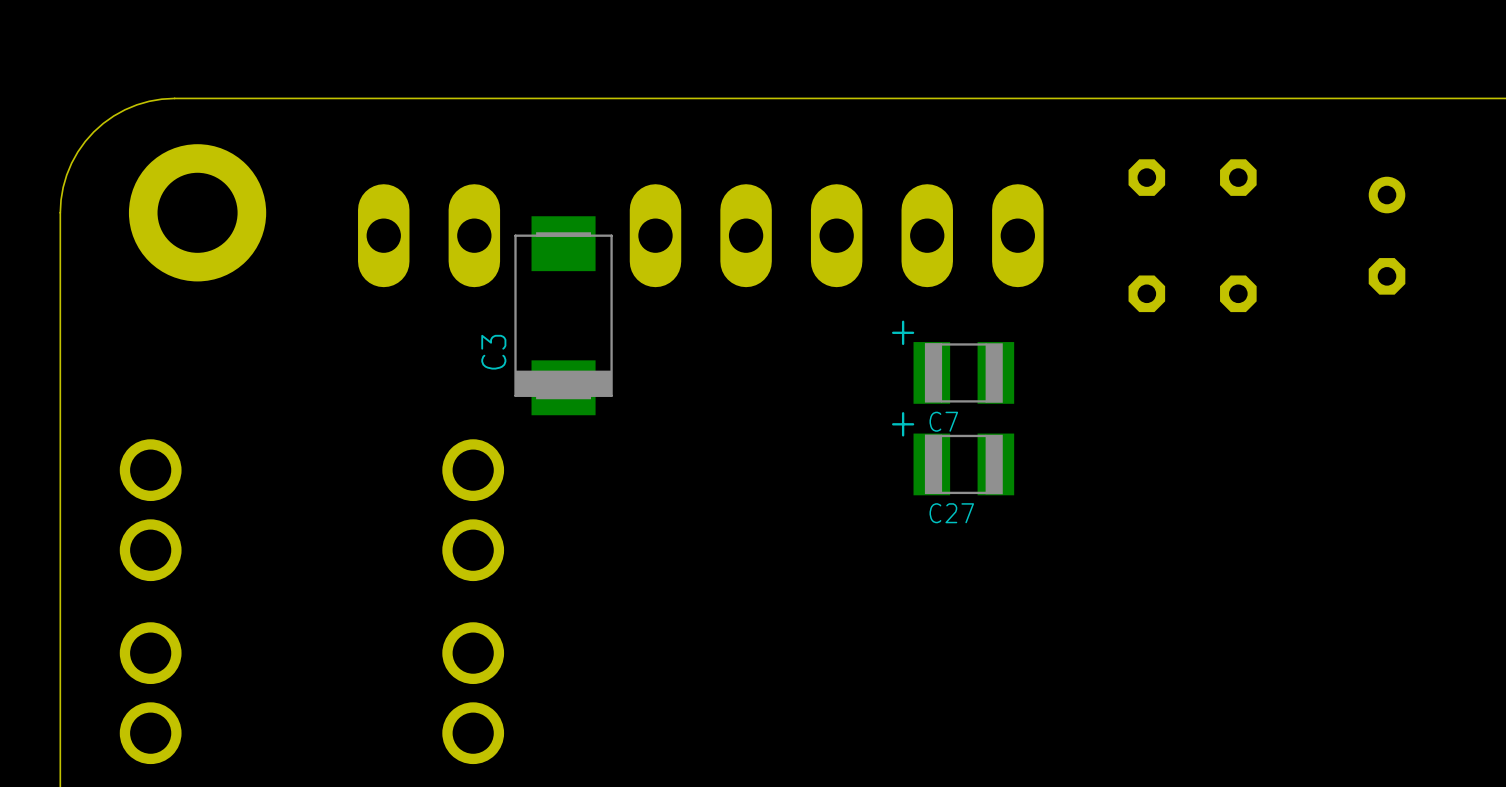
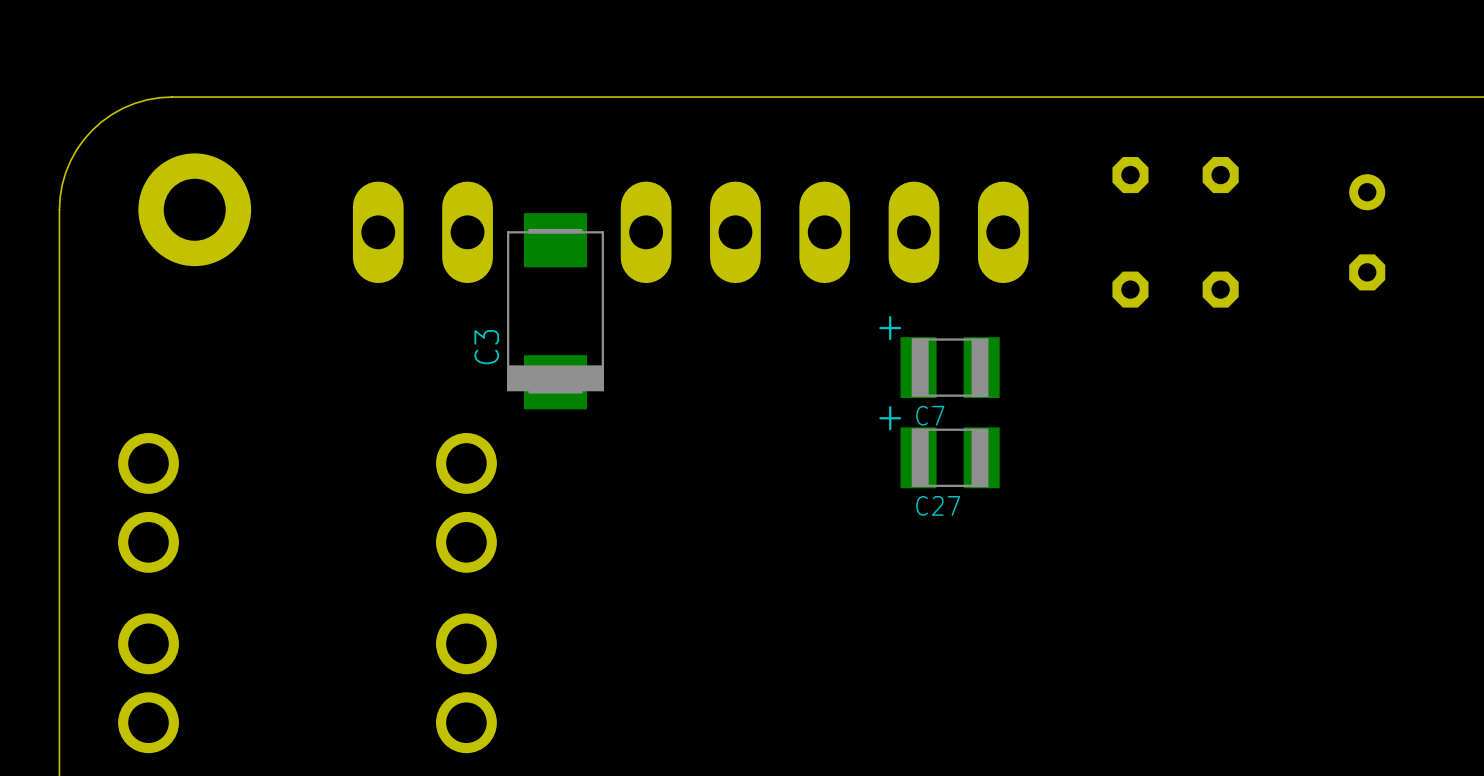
part footprint: [128, 144, 267, 282] -> [138, 153, 252, 267]

